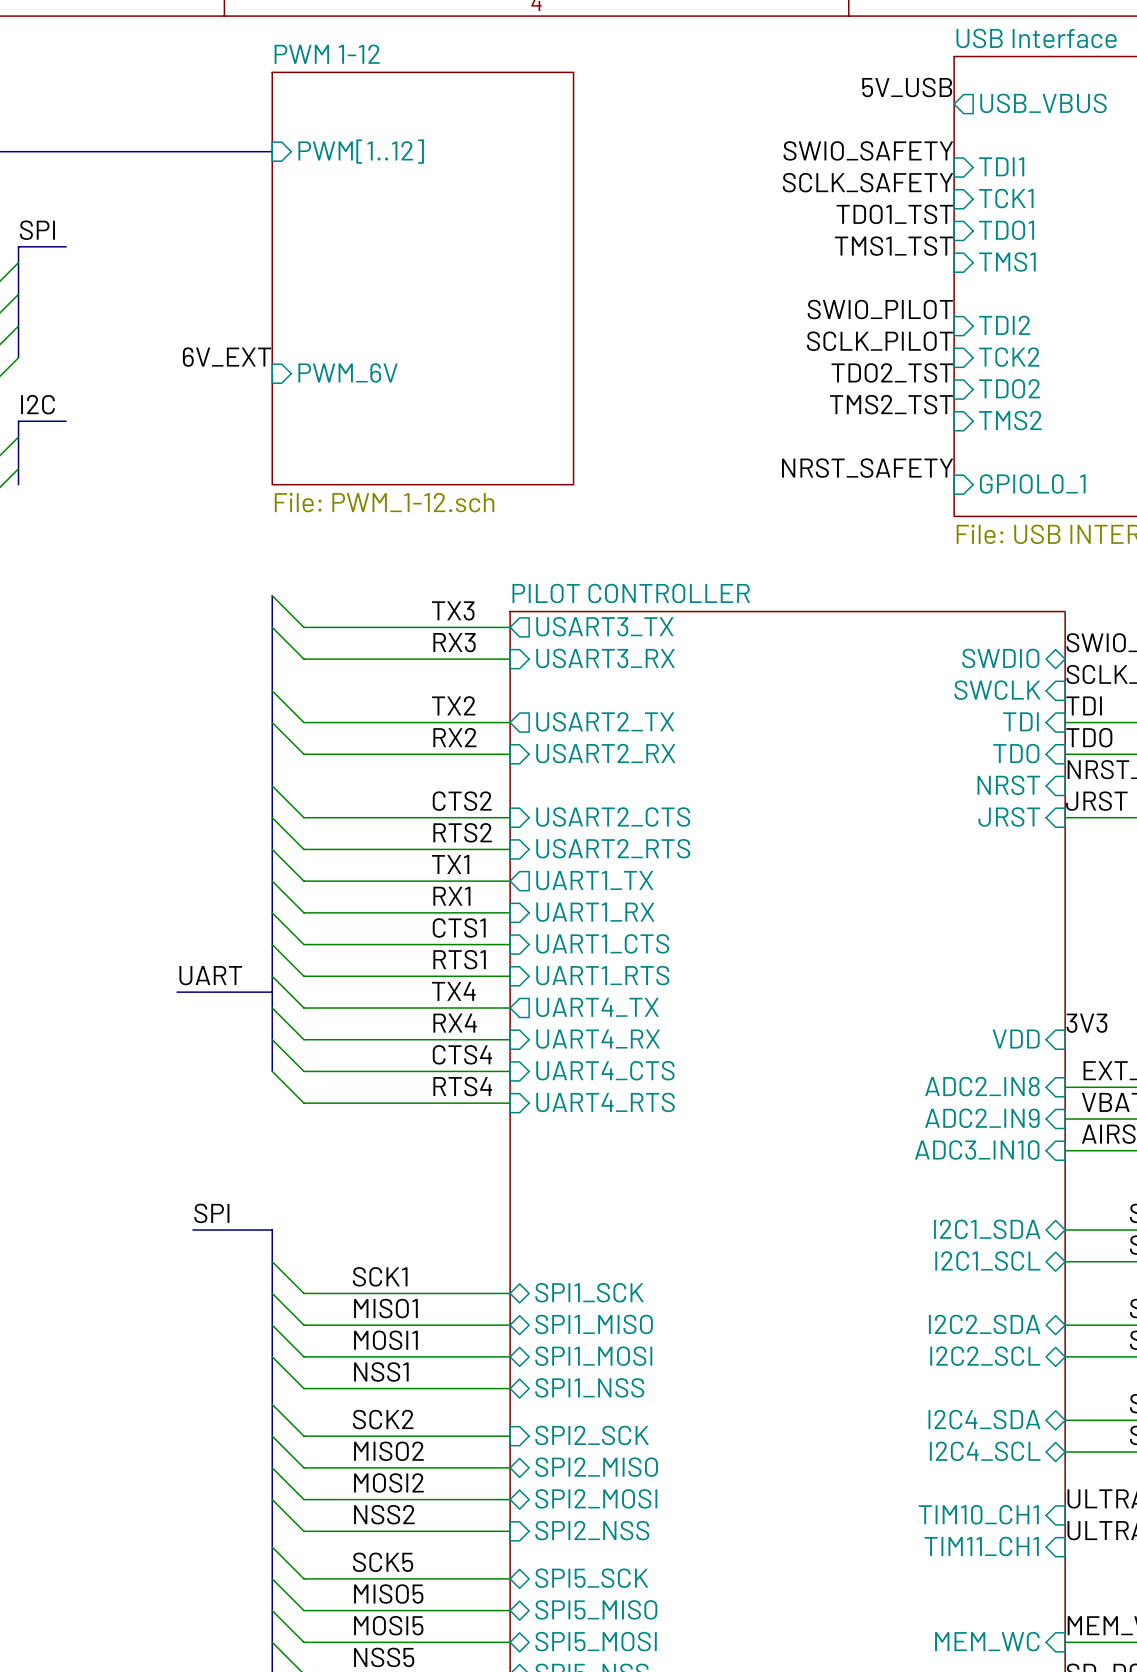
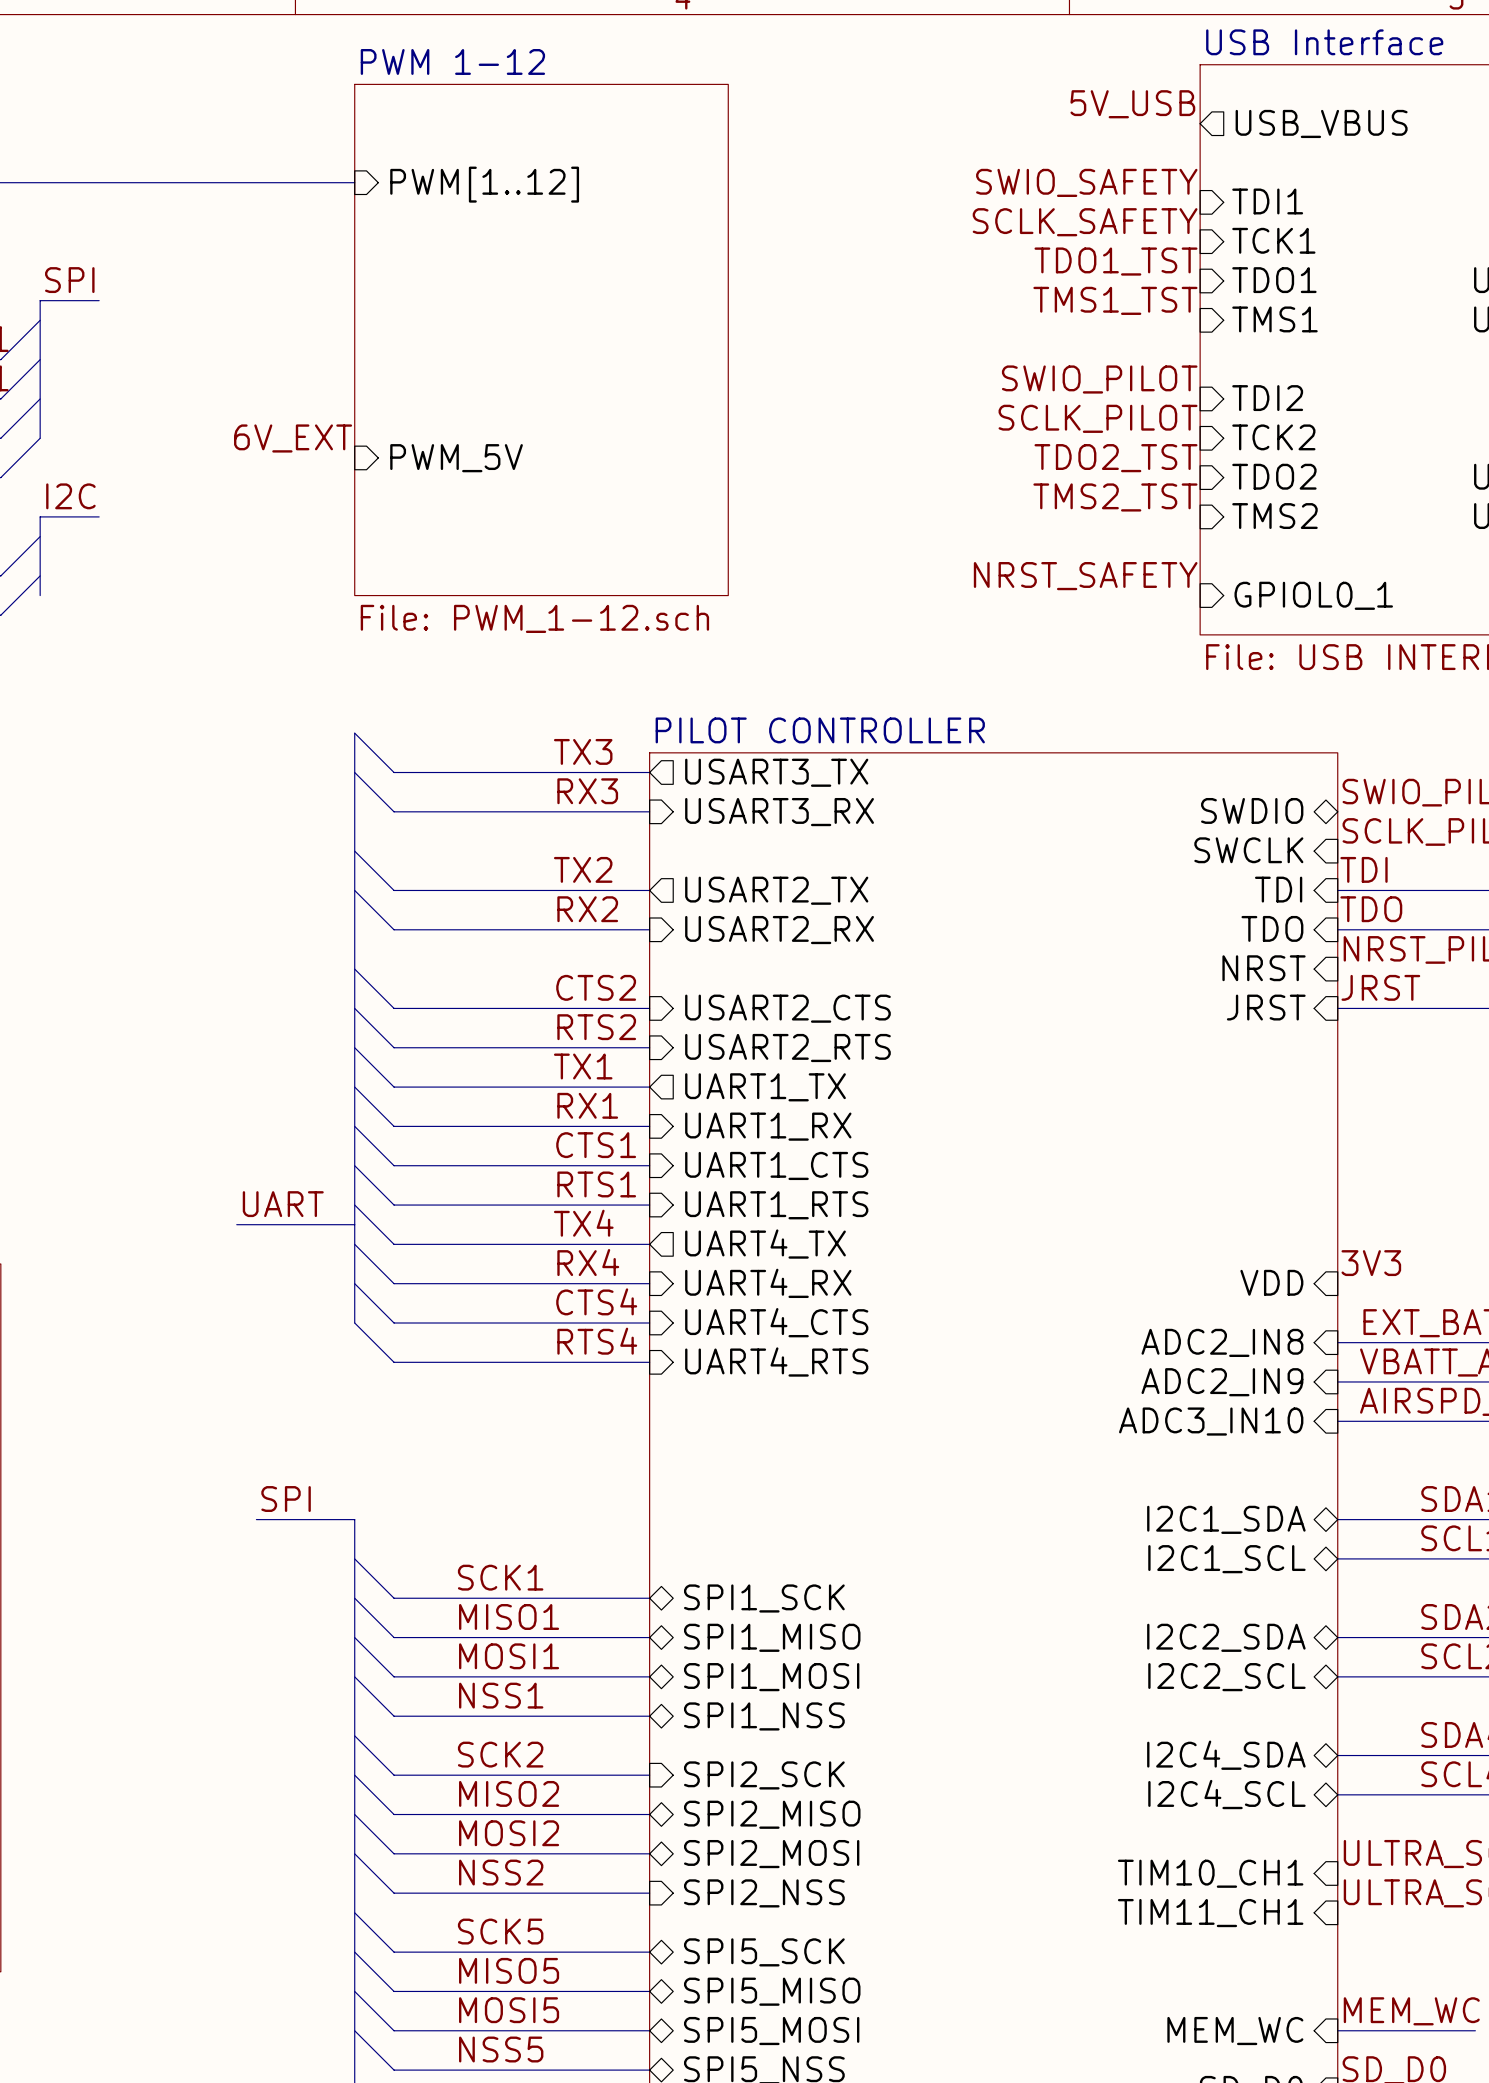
sheet pin: PWM_6V (348, 372) -> PWM_5V (456, 458)

